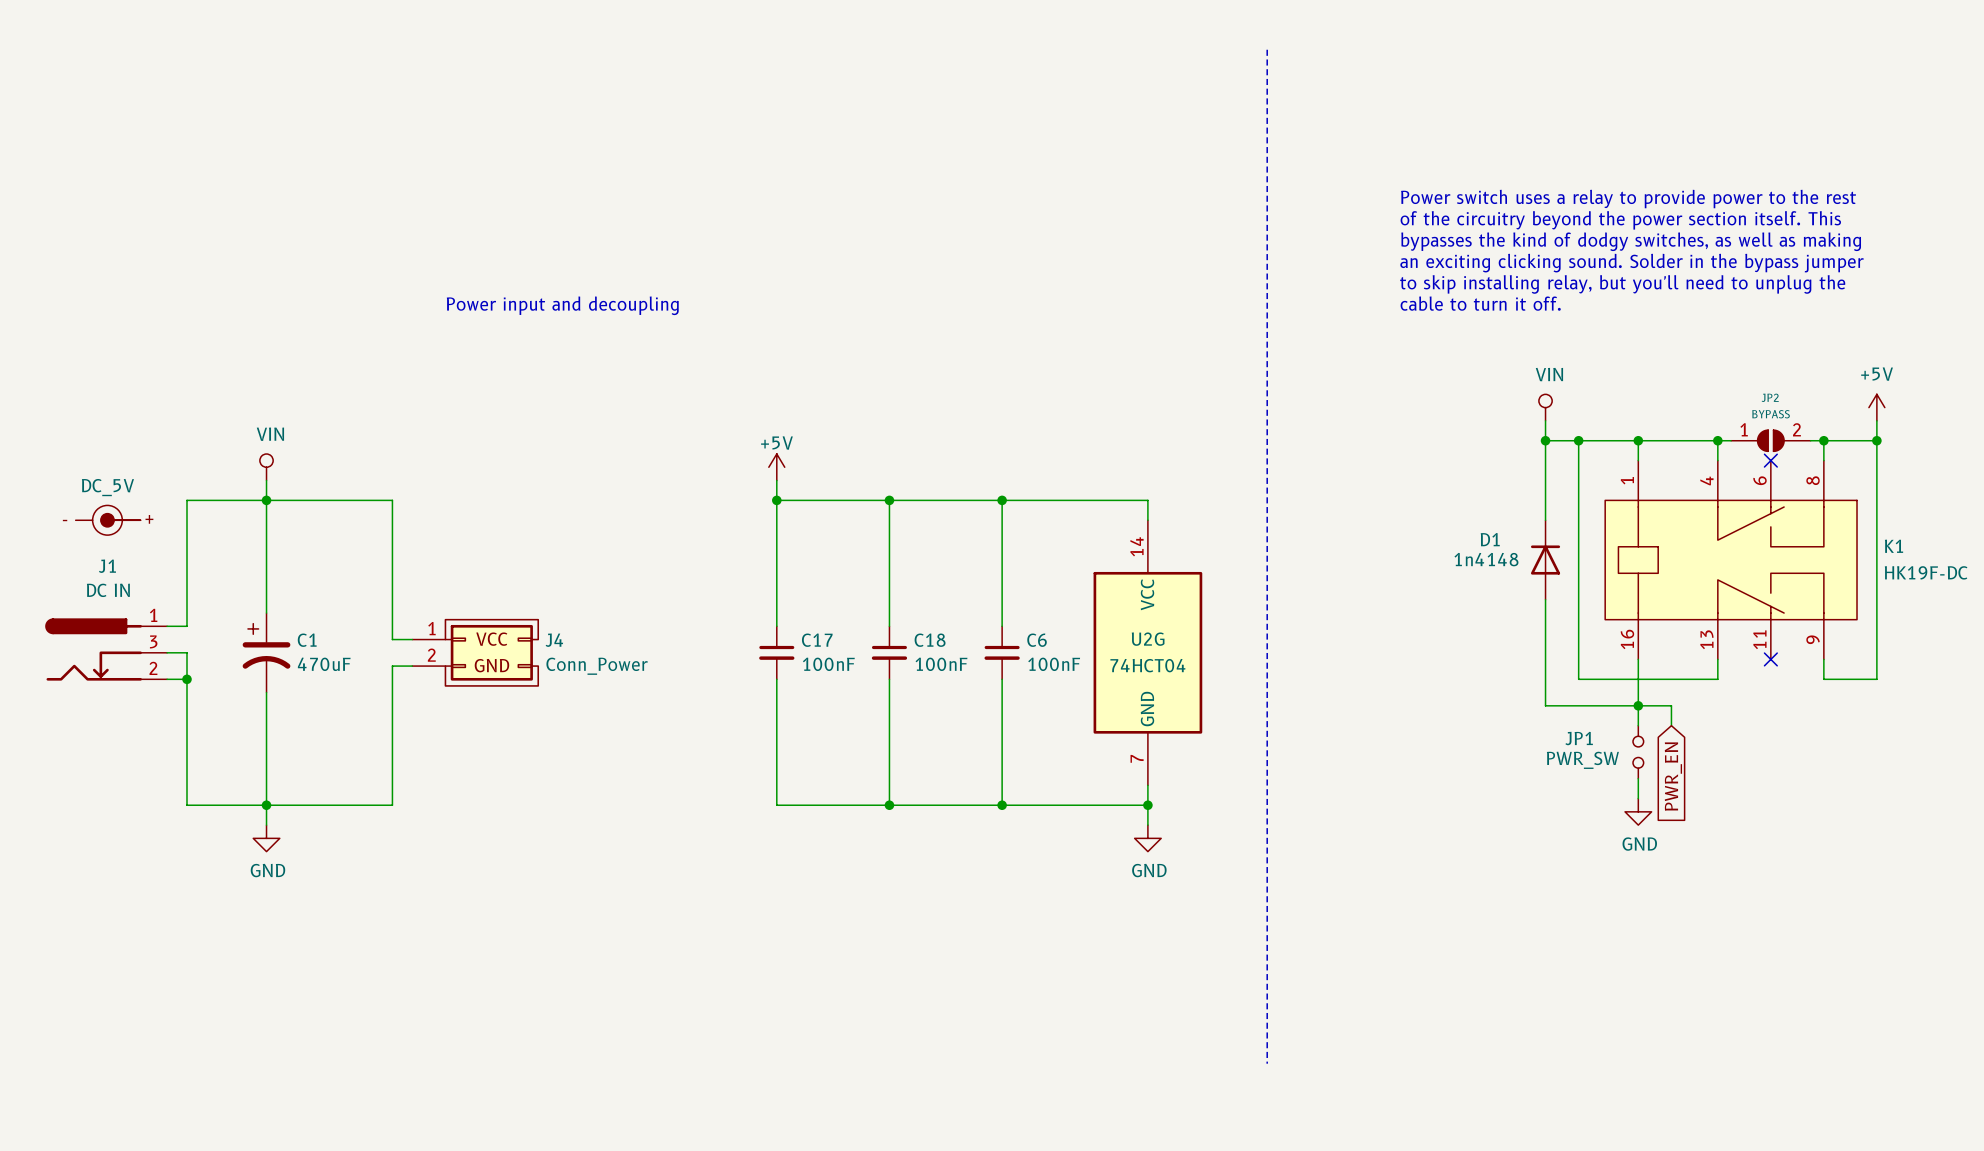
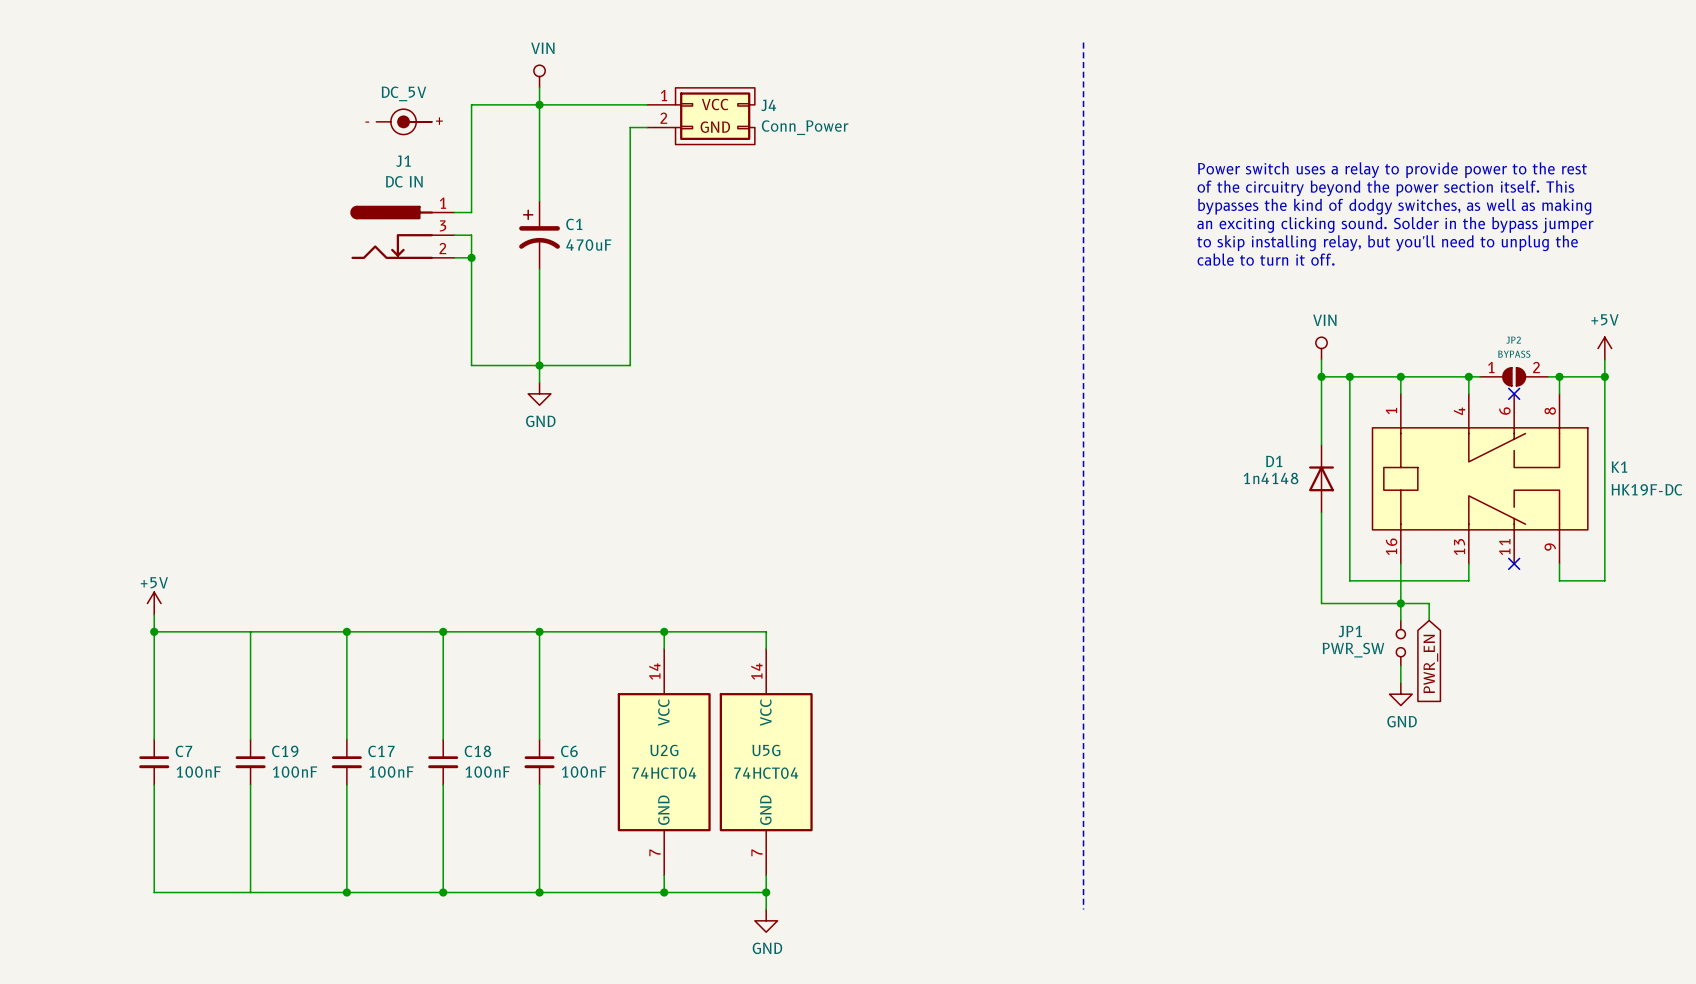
power symbol: none -> VIN (539, 76)
wire: none -> (539, 87) (539, 201)
junction: none -> (539, 104)
wire: none -> (647, 104) (471, 104) (471, 212) (454, 212)
part: none -> DC_5V (404, 121)
wire: none -> (647, 127) (630, 127) (630, 365) (471, 365) (471, 235) (454, 235)
wire: none -> (454, 257) (471, 257)
junction: none -> (471, 257)
text: Power input and decoupling (562, 305) -> none
wire: none -> (539, 269) (539, 382)
junction: none -> (539, 365)
power symbol: none -> GND (539, 393)
power symbol: VIN (266, 467) -> none
power symbol: +5V (776, 467) -> none
wire: (266, 480) (266, 613) -> none
wire: (776, 480) (776, 626) -> none
junction: (266, 500) -> none
wire: (776, 500) (1147, 500) (1147, 520) -> none
junction: (776, 500) -> none
wire: (889, 500) (889, 626) -> none
junction: (889, 500) -> none
wire: (1002, 500) (1002, 626) -> none
junction: (1002, 500) -> none
part: DC_5V (108, 520) -> none
wire: (167, 626) (186, 626) (186, 500) (392, 500) (392, 639) (412, 639) -> none
J1 position: (106, 649) -> (402, 232)
wire: (167, 652) (186, 652) (186, 805) (392, 805) (392, 666) (412, 666) -> none
C1 position: (266, 652) -> (539, 235)
J4 position: (475, 652) -> (701, 116)
C17 position: (776, 652) -> (346, 762)
C18 position: (889, 652) -> (443, 762)
C6 position: (1002, 652) -> (539, 762)
U2G position: (1147, 652) -> (664, 762)
wire: (167, 679) (186, 679) -> none
junction: (186, 679) -> none
wire: (776, 679) (776, 738) -> none
wire: (889, 679) (889, 805) -> none
wire: (1002, 679) (1002, 805) -> none
wire: (266, 692) (266, 825) -> none
power symbol: none -> +5V (154, 603)
wire: none -> (154, 614) (154, 739)
wire: none -> (154, 631) (766, 631) (766, 648)
junction: none -> (154, 631)
wire: none -> (250, 631) (250, 739)
wire: none -> (346, 631) (346, 739)
junction: none -> (346, 631)
wire: none -> (443, 631) (443, 739)
junction: none -> (443, 631)
wire: none -> (539, 631) (539, 739)
junction: none -> (539, 631)
junction: none -> (664, 631)
wire: (776, 758) (776, 805) (1147, 805) -> none
wire: (1147, 785) (1147, 825) -> none
junction: (266, 805) -> none
junction: (889, 805) -> none
junction: (1002, 805) -> none
junction: (1147, 805) -> none
power symbol: GND (266, 838) -> none
power symbol: GND (1147, 838) -> none
C7: none -> 100nF (154, 762)
C19: none -> 100nF (250, 762)
U5G: none -> 74HCT04 (766, 762)
wire: none -> (154, 784) (154, 892) (766, 892)
wire: none -> (250, 784) (250, 892)
wire: none -> (346, 784) (346, 892)
wire: none -> (443, 784) (443, 892)
wire: none -> (539, 784) (539, 892)
wire: none -> (664, 875) (664, 892)
wire: none -> (766, 875) (766, 909)
junction: none -> (346, 892)
junction: none -> (443, 892)
junction: none -> (539, 892)
junction: none -> (664, 892)
junction: none -> (766, 892)
power symbol: none -> GND (766, 920)

